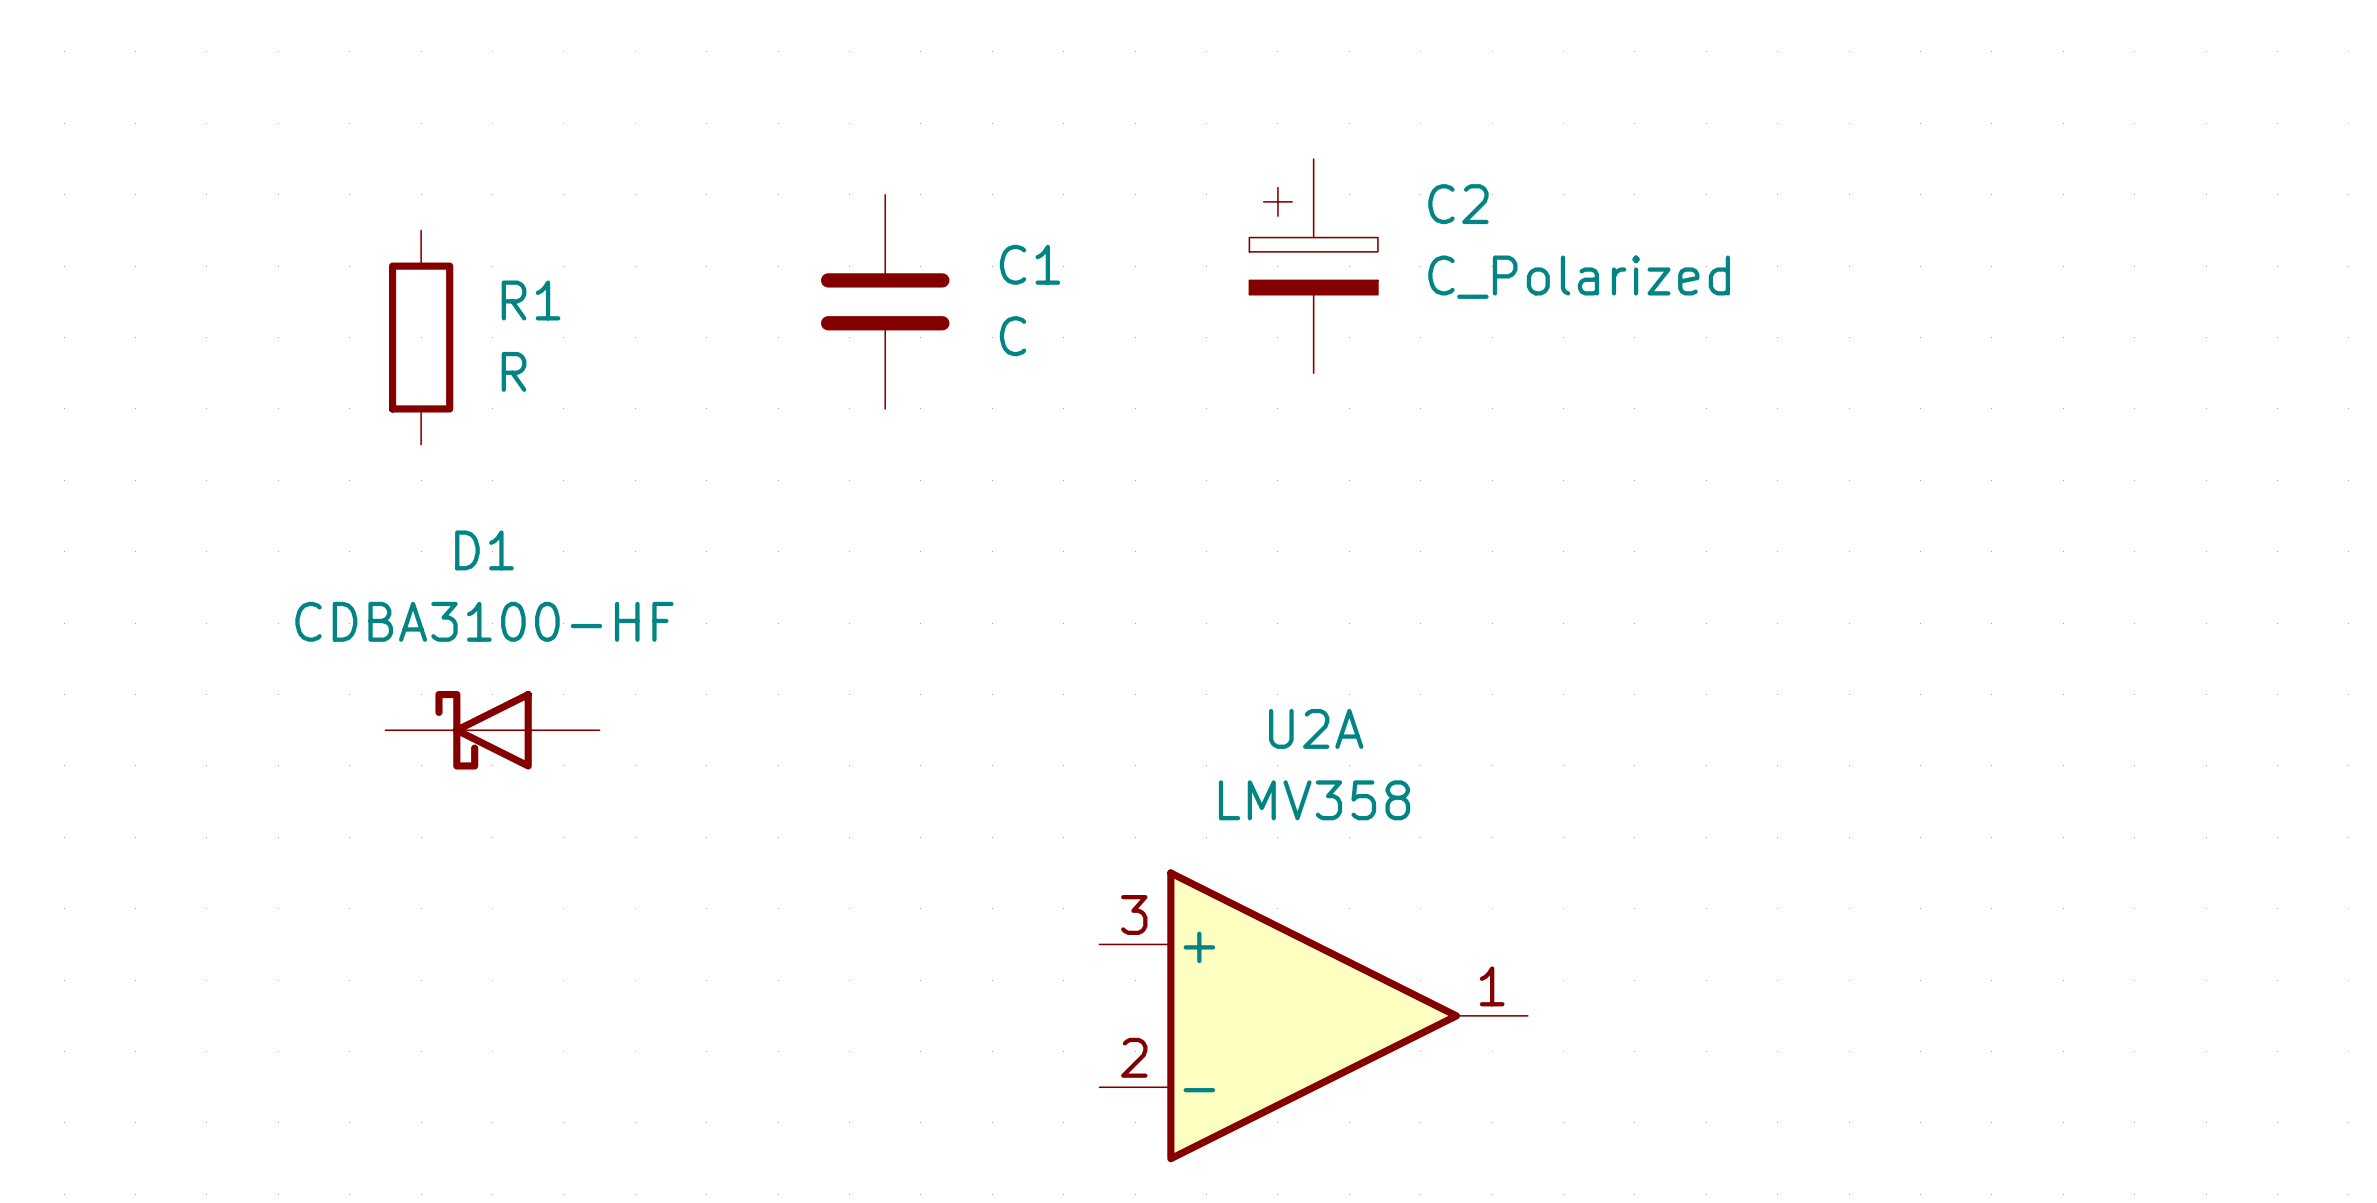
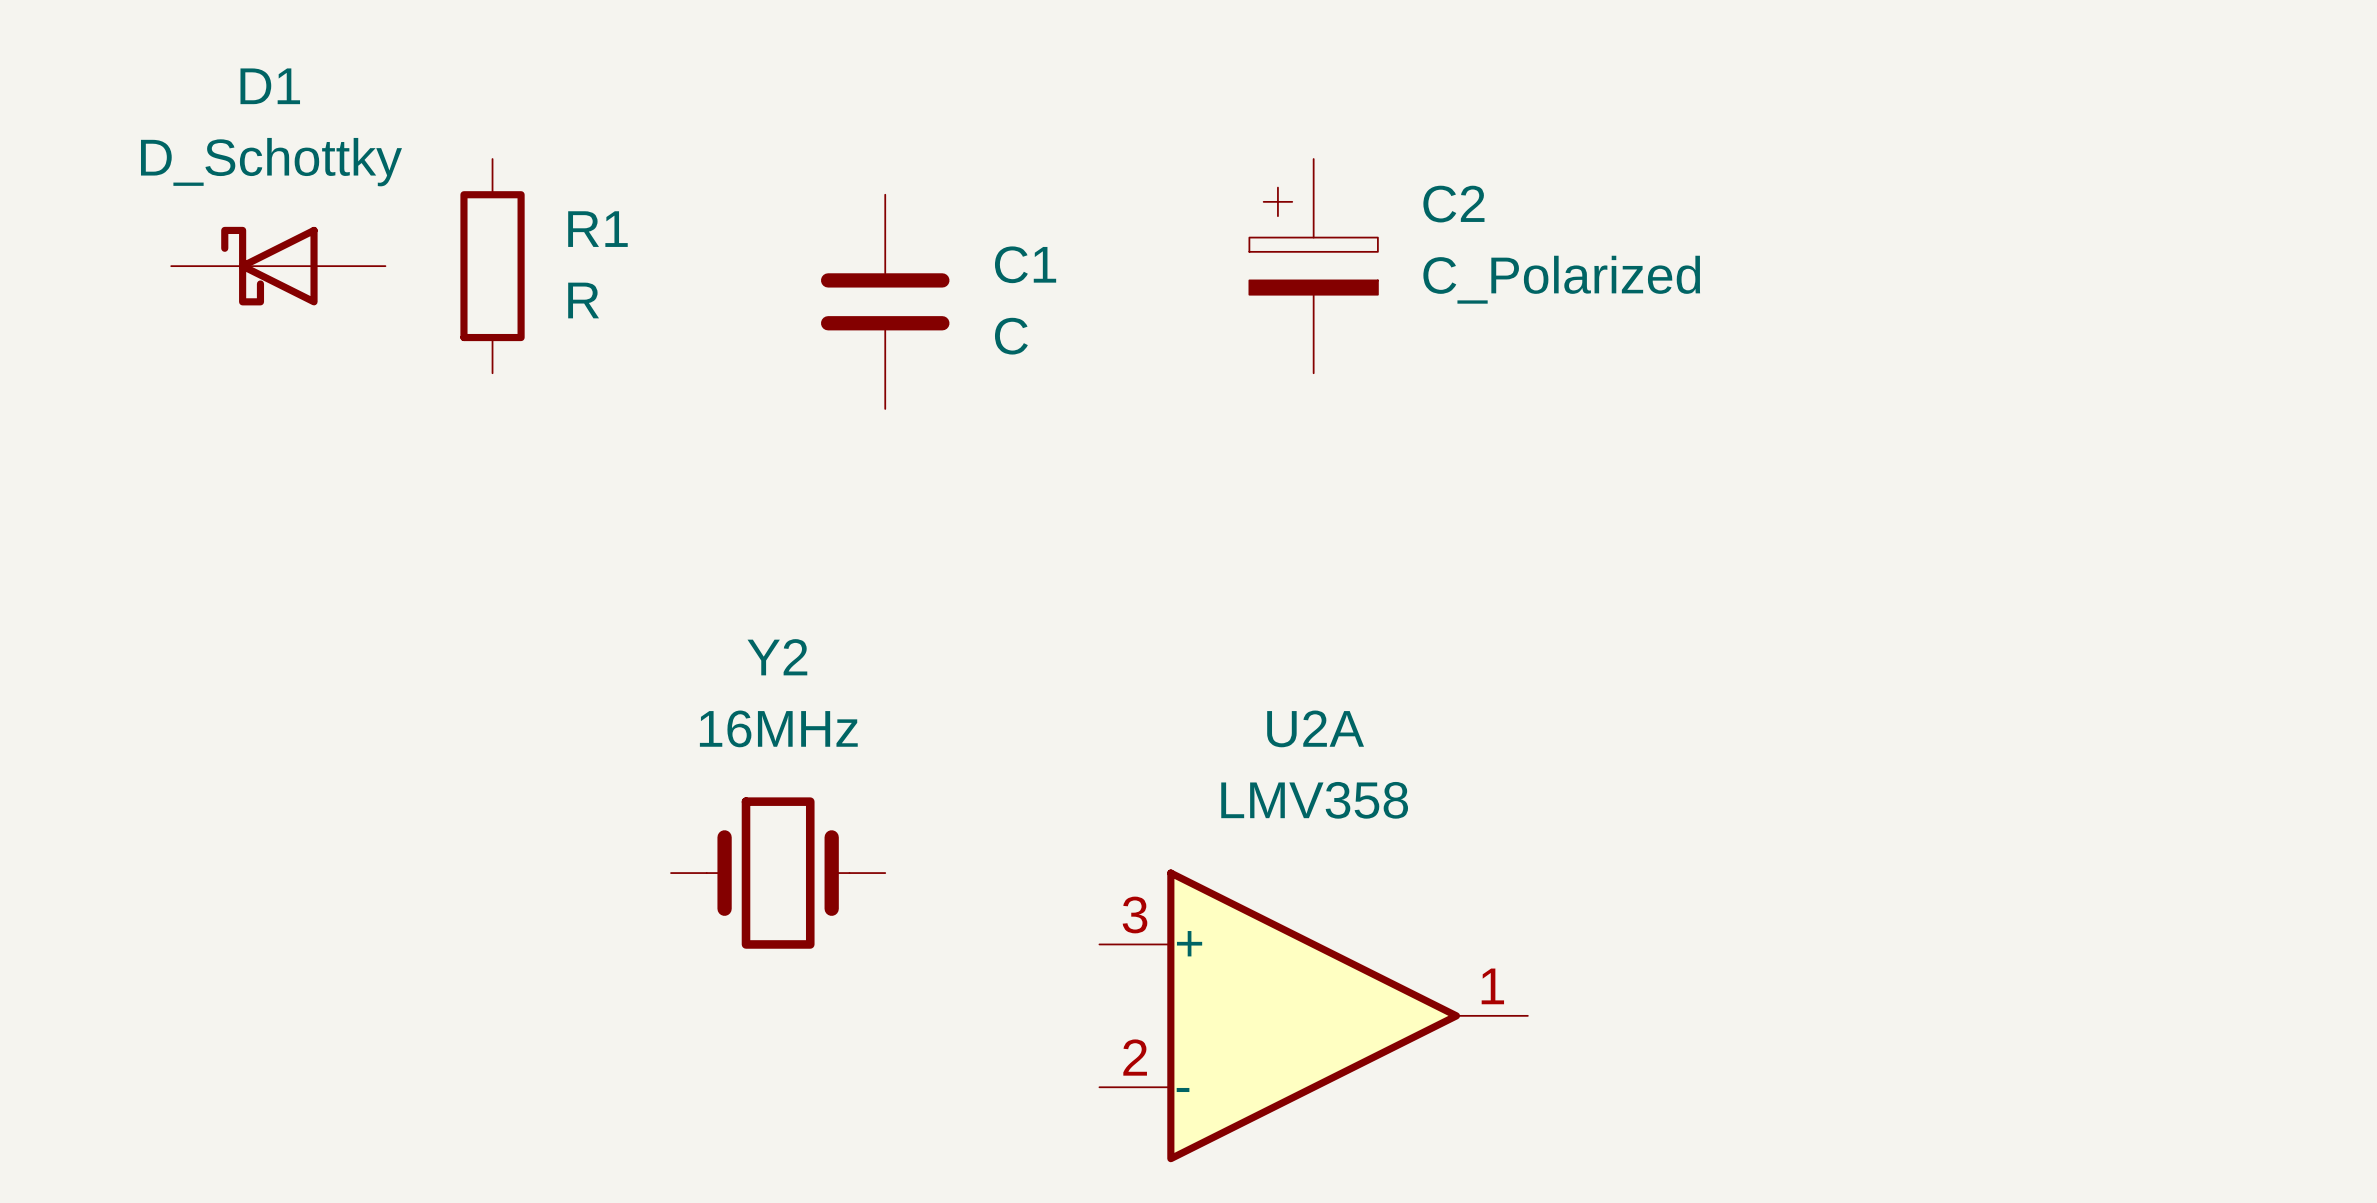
R1 position: (421, 337) -> (492, 266)
D1 value: CDBA3100-HF (484, 621) -> D_Schottky (271, 162)
D1 position: (492, 730) -> (278, 266)
Y2: none -> 16MHz (778, 873)

